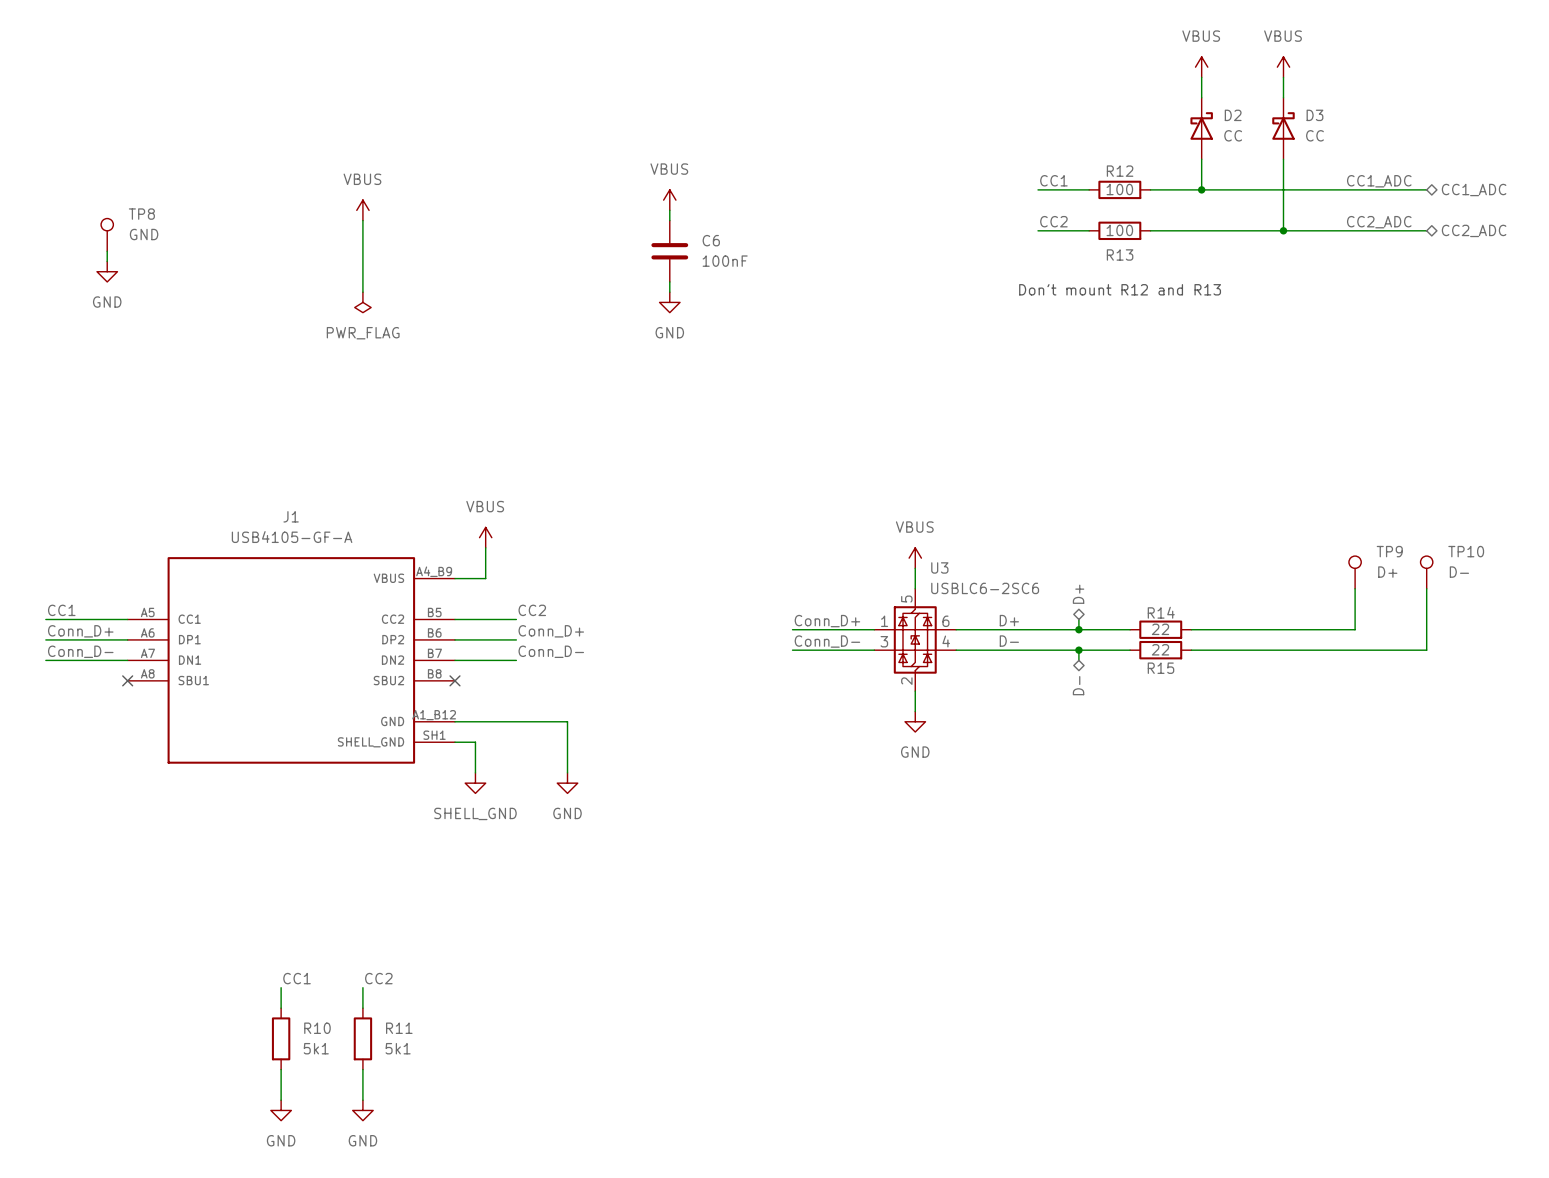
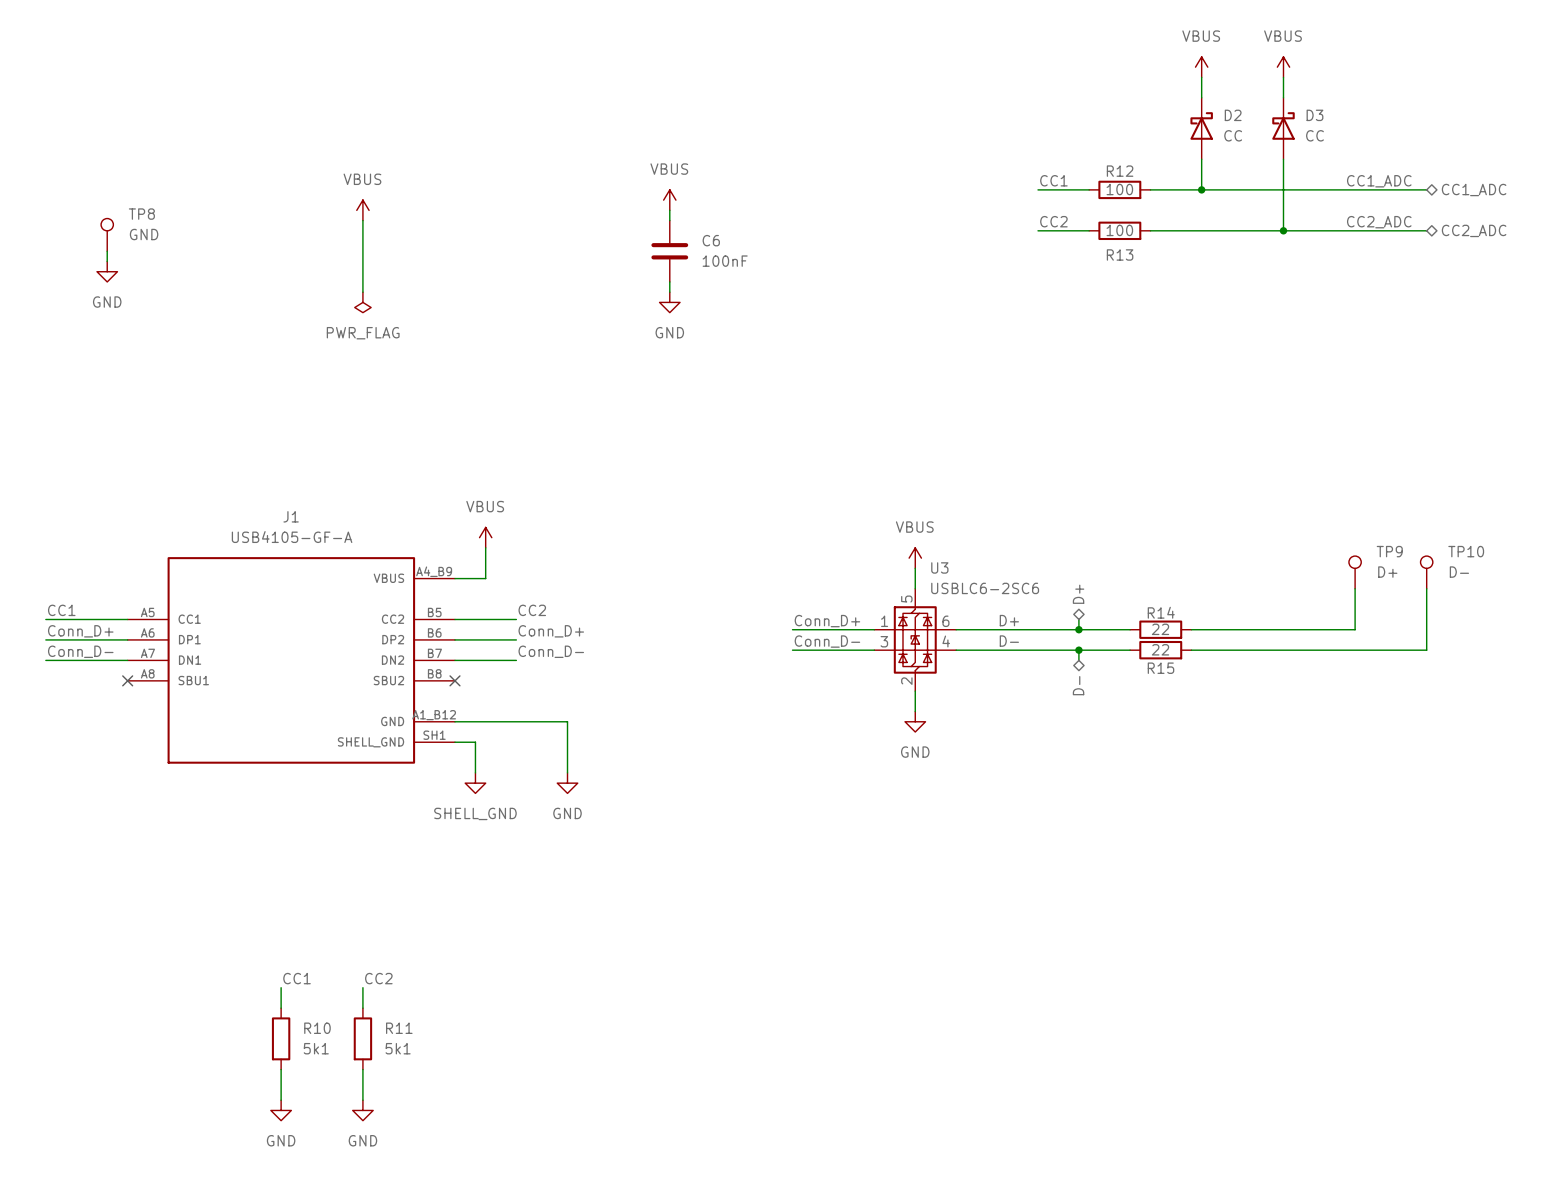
text: Don't mount R12 and R13 (1120, 289) -> none

